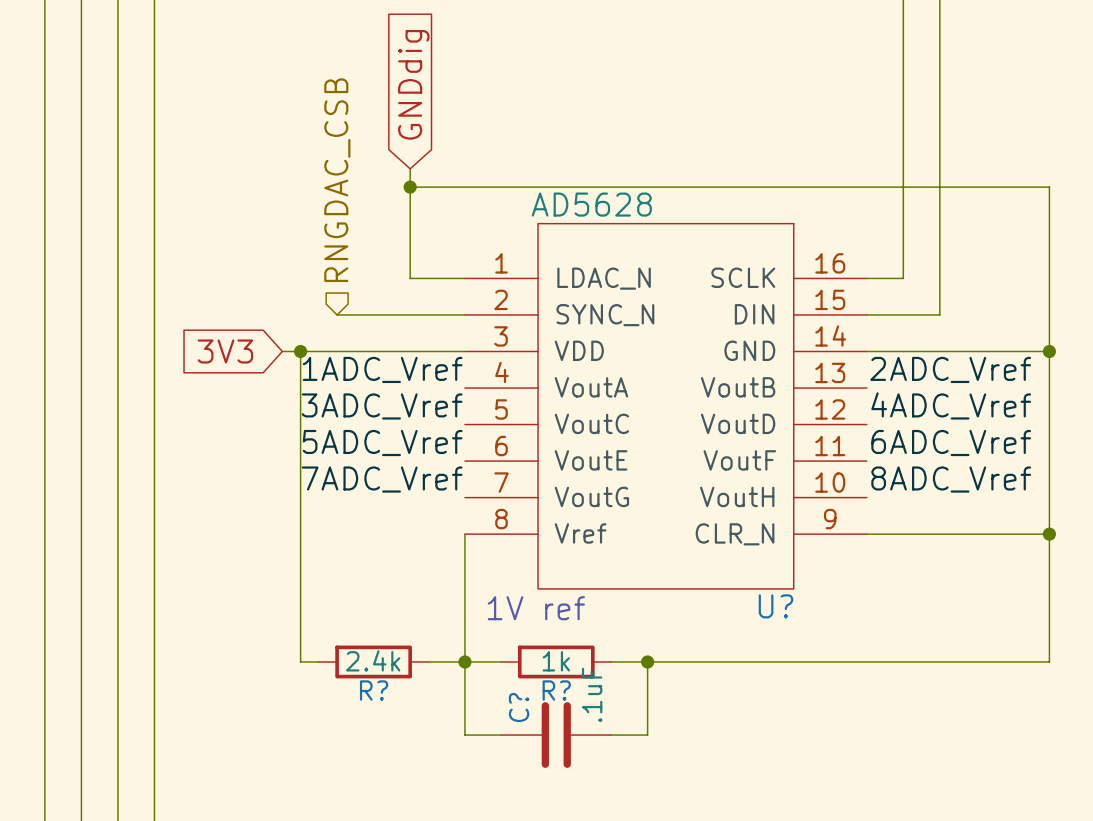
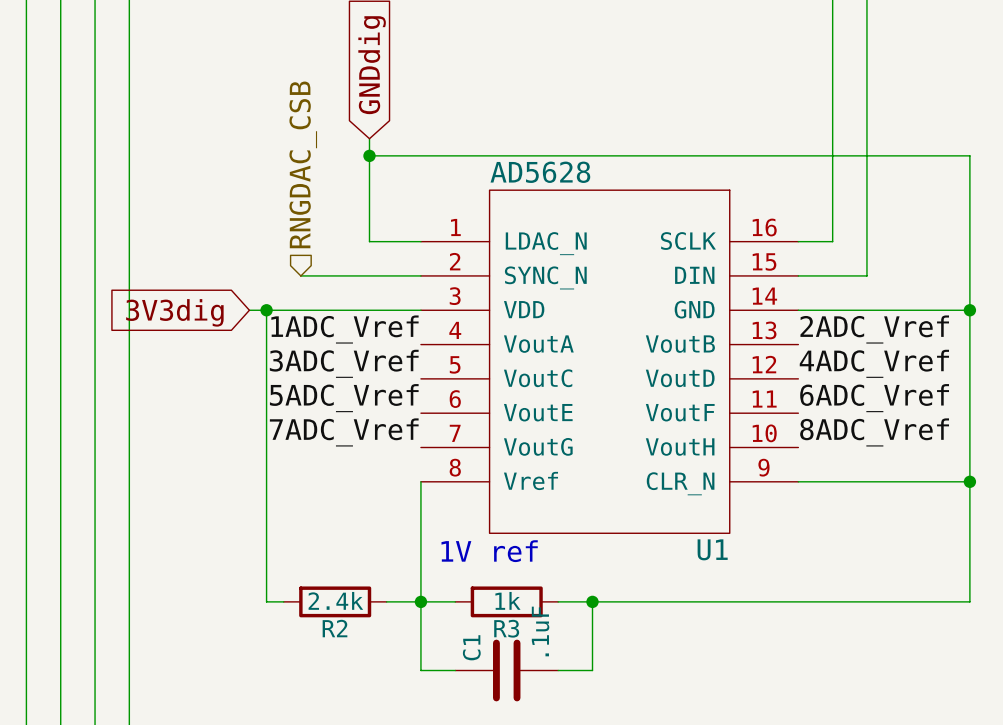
global label: 3V3 (225, 351) -> 3V3dig (174, 312)
U? name: U? (775, 606) -> U1 (712, 549)
R? name: R? (374, 690) -> R2 (335, 628)
R? name: R? (556, 690) -> R3 (506, 628)
C? name: C? (519, 707) -> C1 (471, 647)

